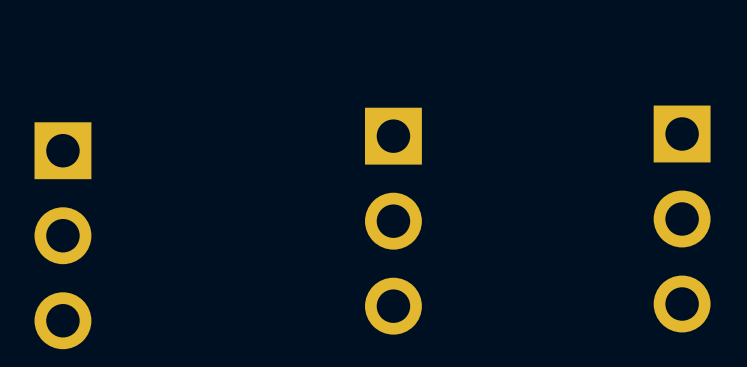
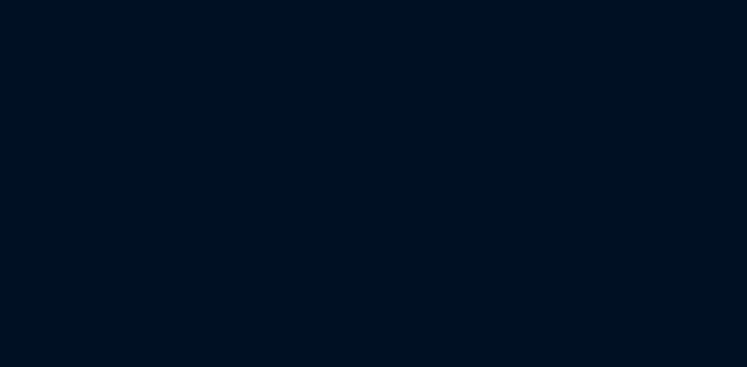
part: (682, 219) -> none
part: (393, 221) -> none
part: (62, 235) -> none

